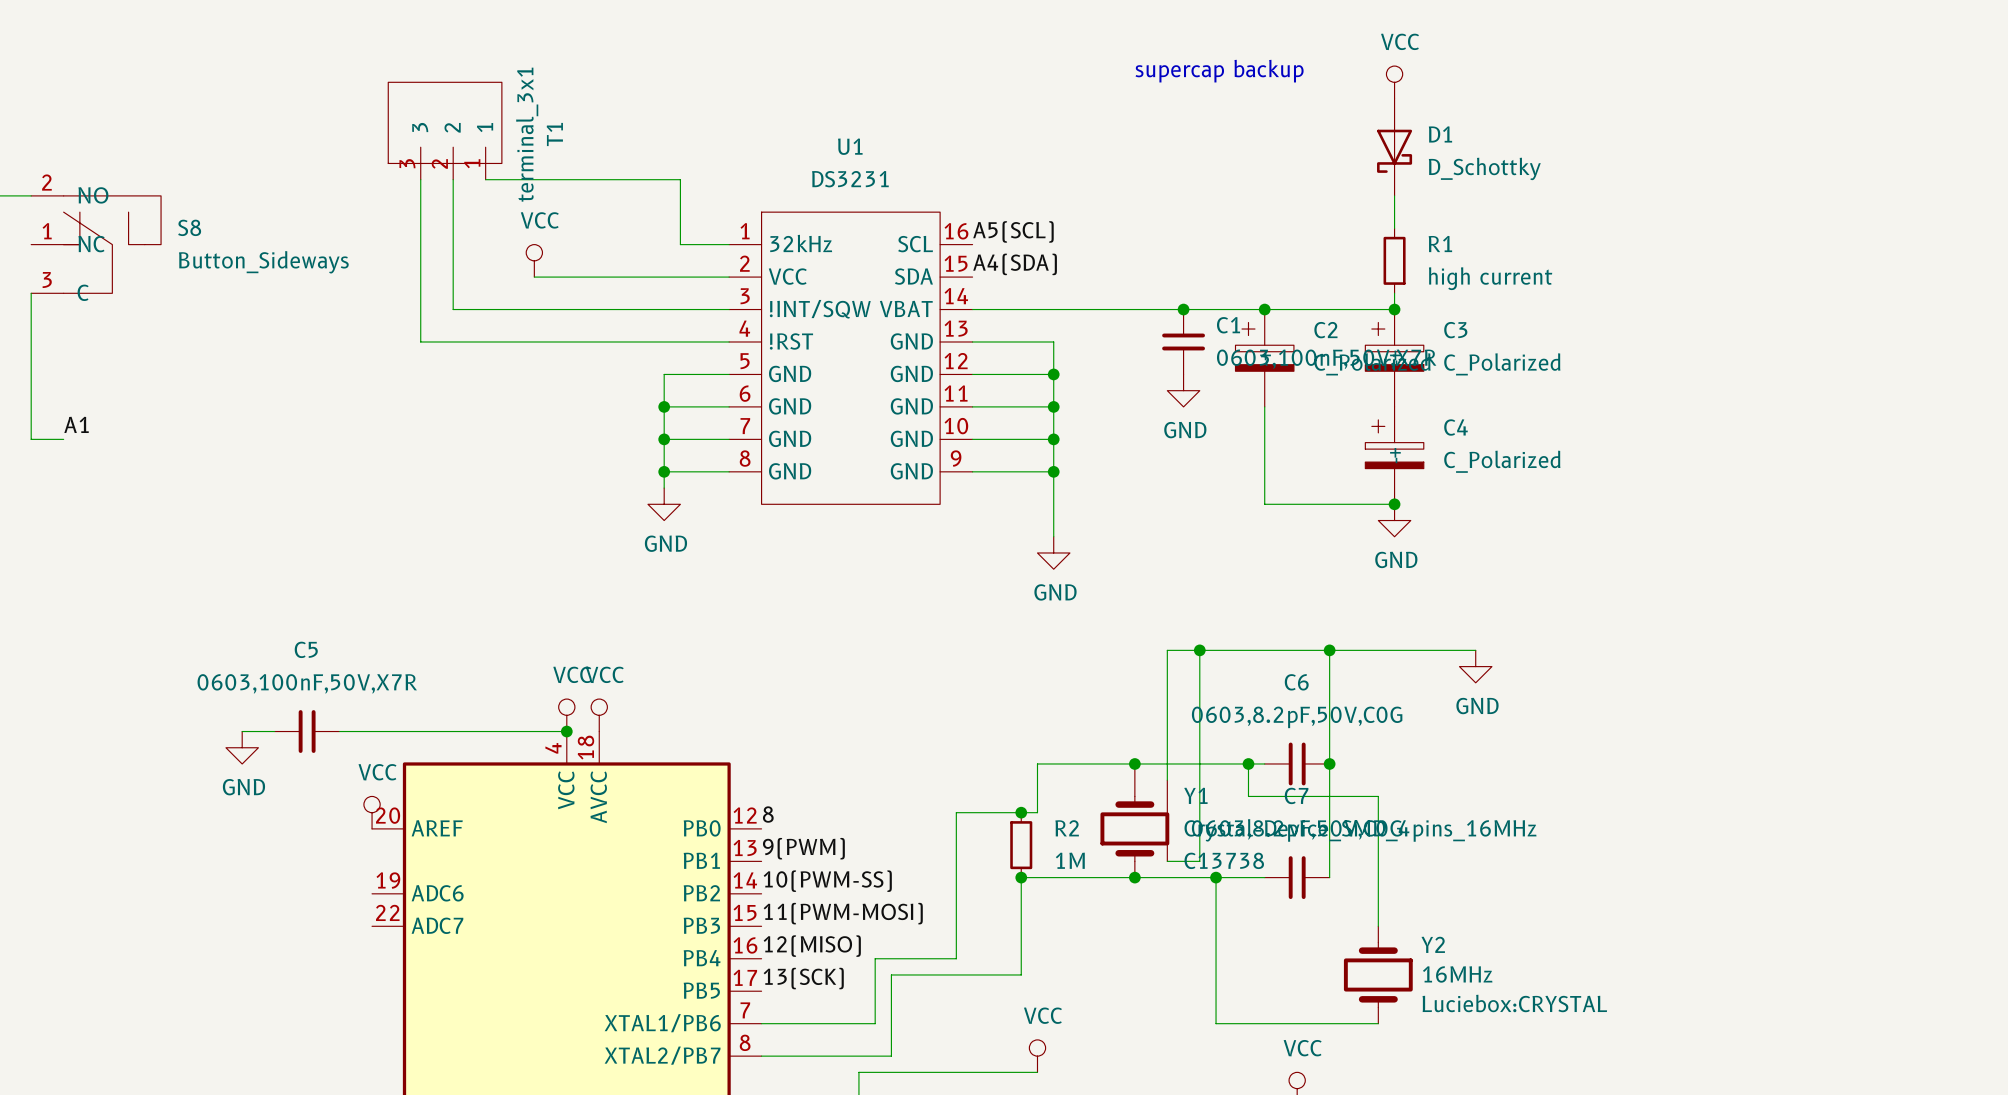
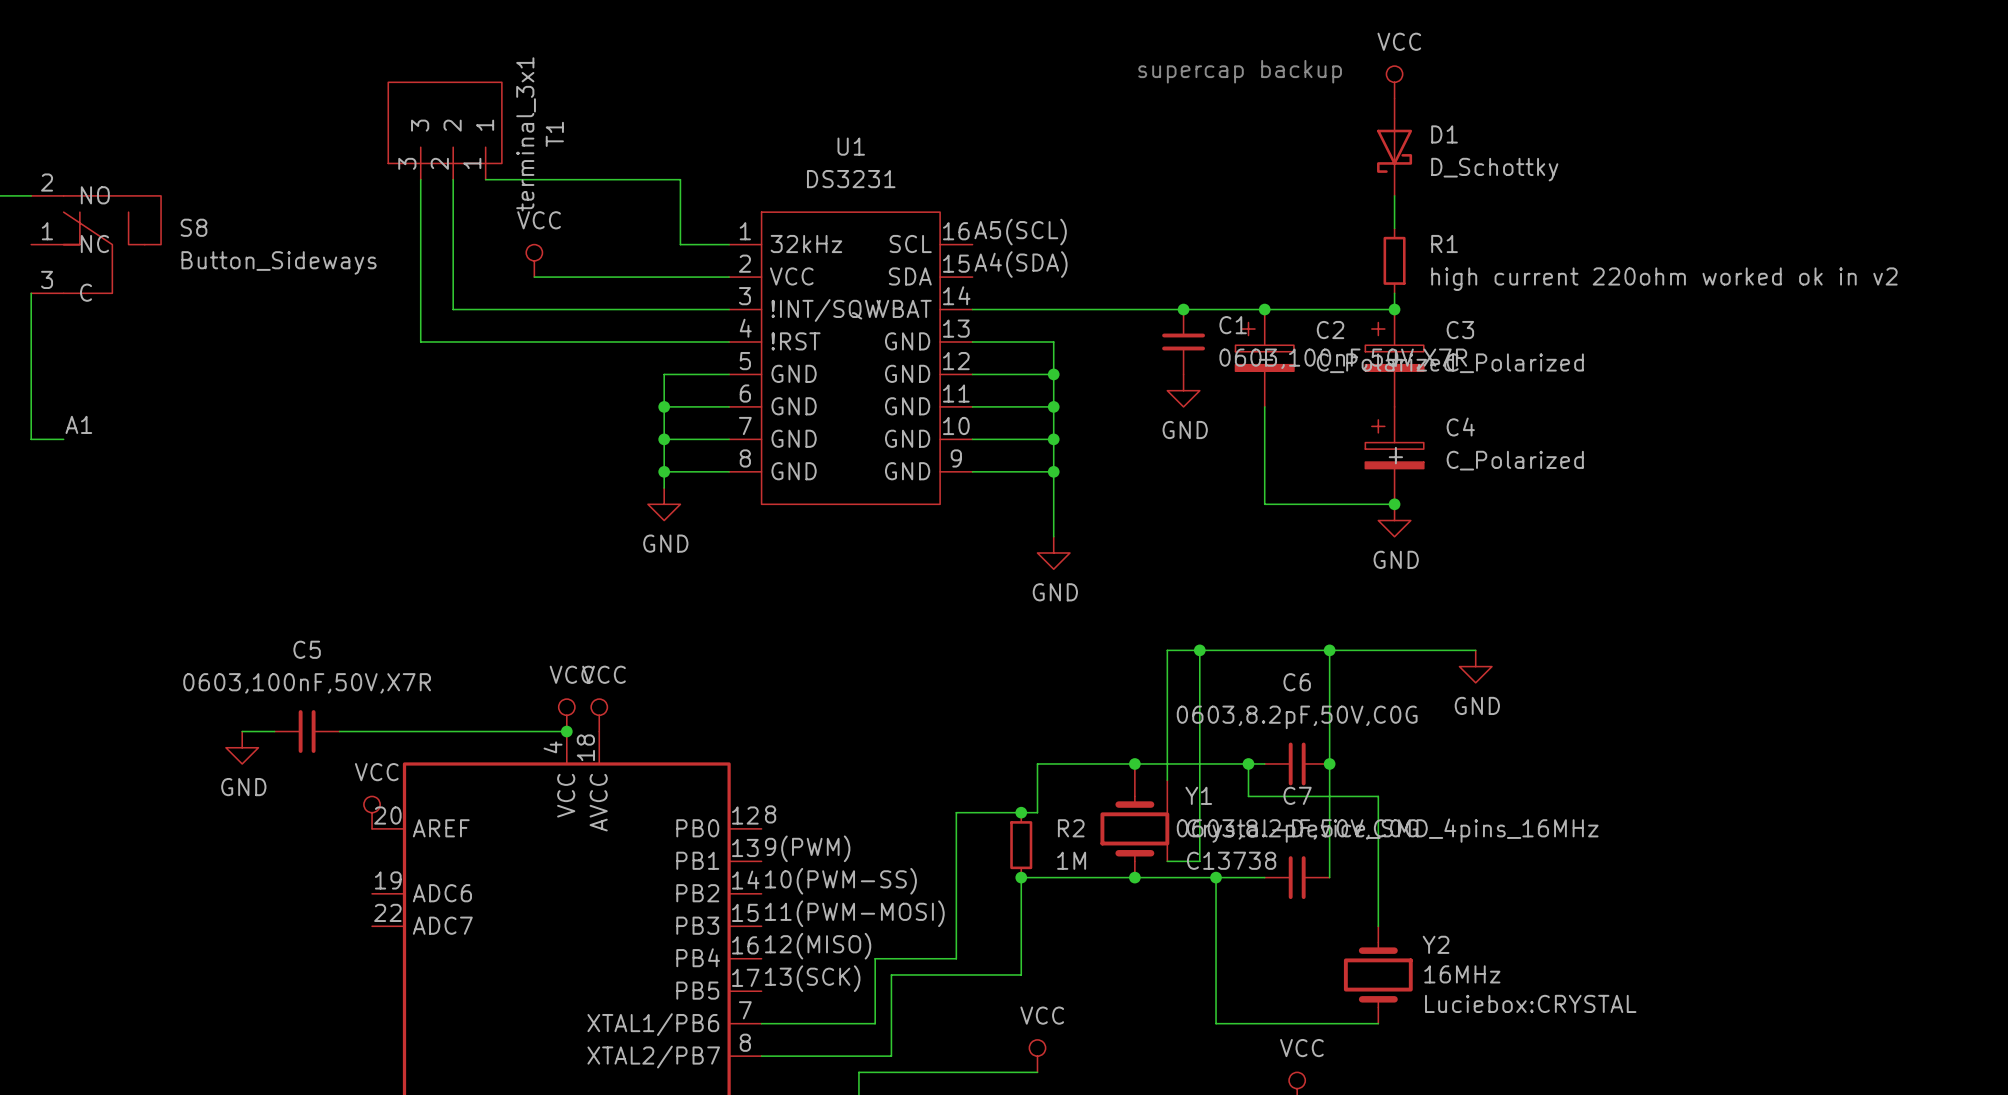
R1 value: high current (1490, 278) -> high current 220ohm worked ok in v2 (1664, 279)

